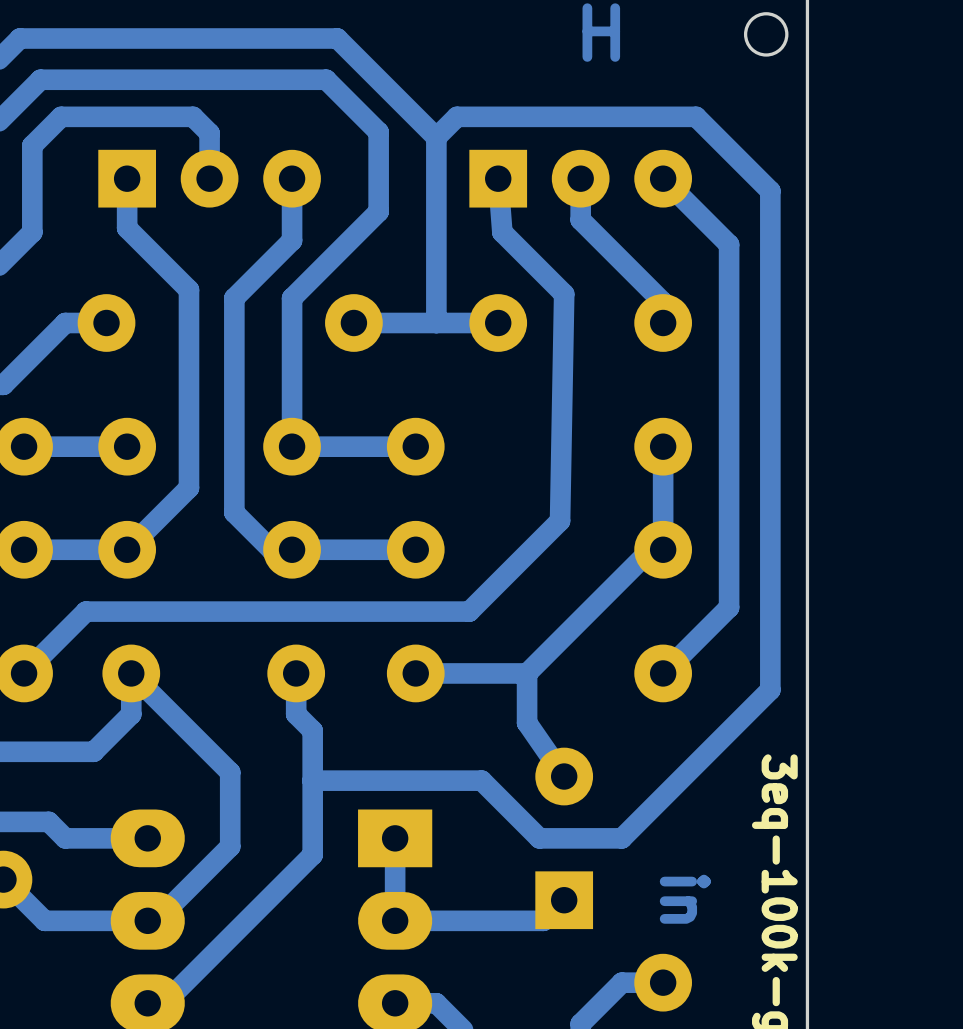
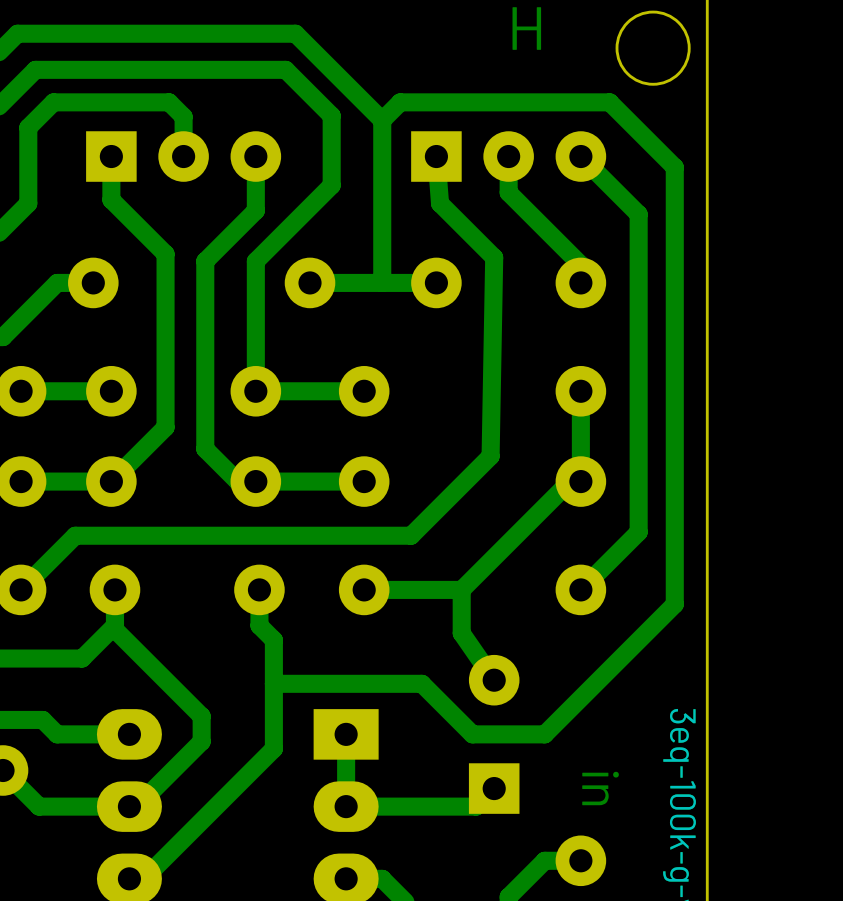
round board edge size: [743, 12, 789, 57] -> [615, 10, 691, 86]
bottom track: (131, 673) (230, 772) (230, 817) -> (114, 625) (114, 629) (201, 716)

